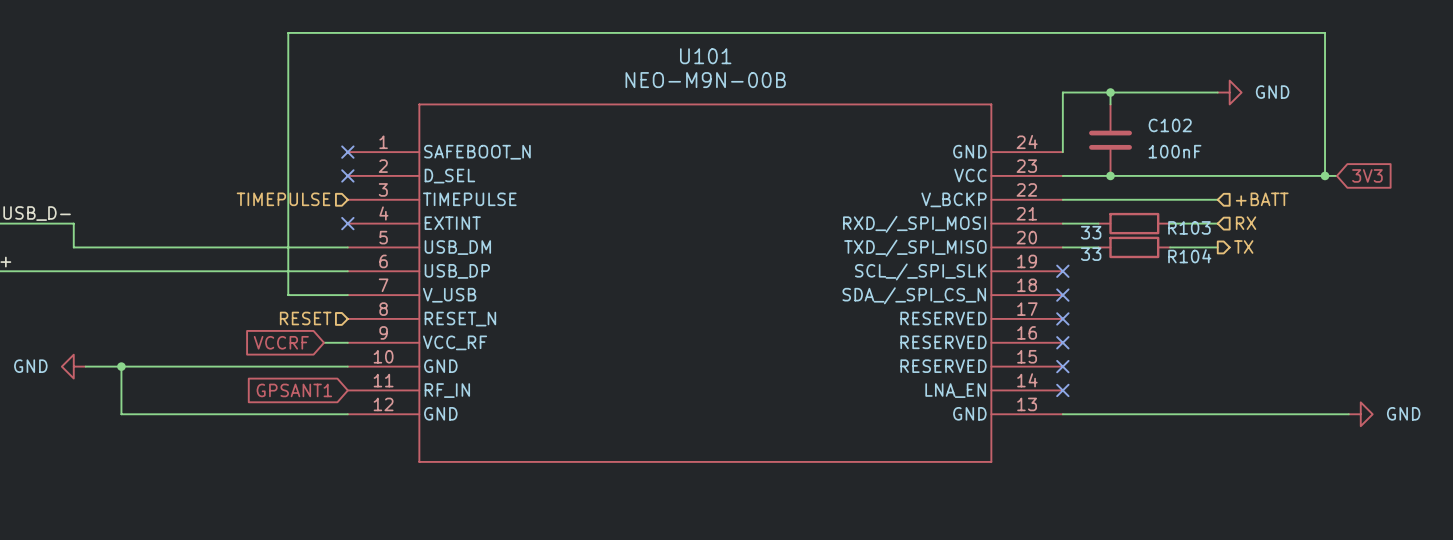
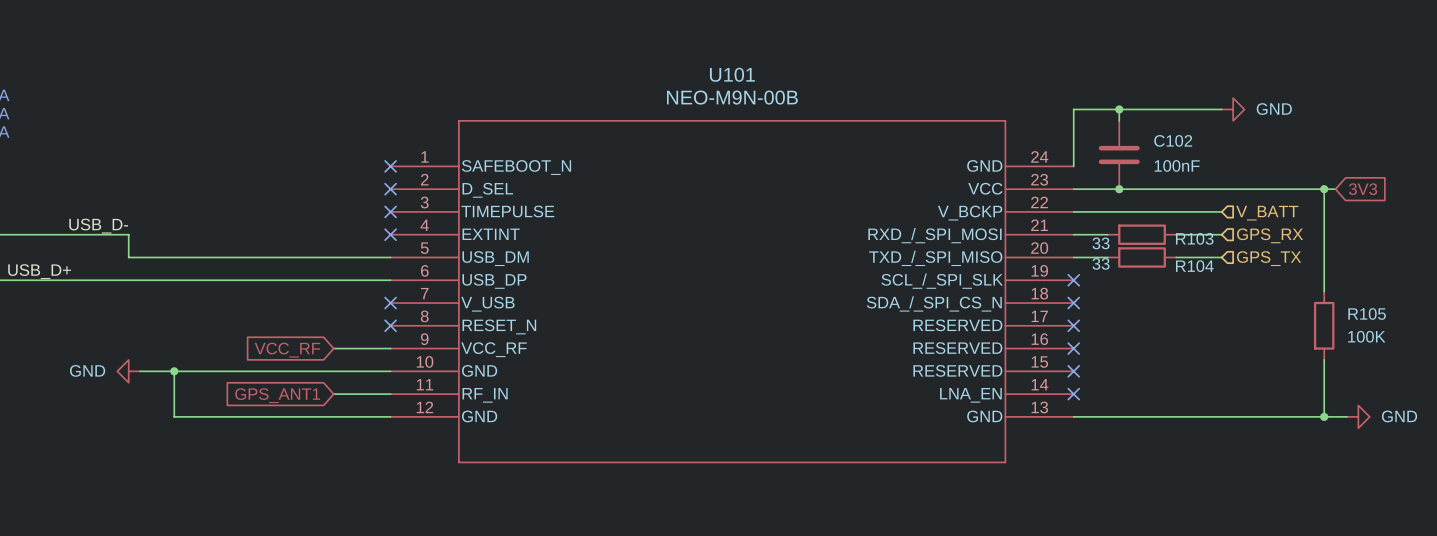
wire: (1325, 175) (1325, 32) (288, 32) (288, 295) (347, 295) -> (1324, 189) (1324, 291)
hierarchical label: TIMEPULSE (283, 199) -> none
no-connect mark: none -> (390, 211)
hierarchical label: +BATT (1262, 199) -> V_BATT (1267, 213)
hierarchical label: RX (1246, 223) -> GPS_RX (1270, 235)
hierarchical label shape: output (1243, 246) -> input (1269, 258)
hierarchical label: TX (1243, 246) -> GPS_TX (1269, 258)
no-connect mark: none -> (390, 303)
hierarchical label: RESET (305, 318) -> none
no-connect mark: none -> (390, 325)
R105: none -> 100K (1324, 325)
global label: VCCRF (281, 342) -> VCC_RF (287, 350)
wire: none -> (333, 348) (367, 348)
wire: none -> (1324, 359) (1324, 416)
wire: none -> (333, 394) (390, 394)
global label: GPSANT1 (294, 390) -> GPS_ANT1 (277, 395)
junction: none -> (1324, 416)

